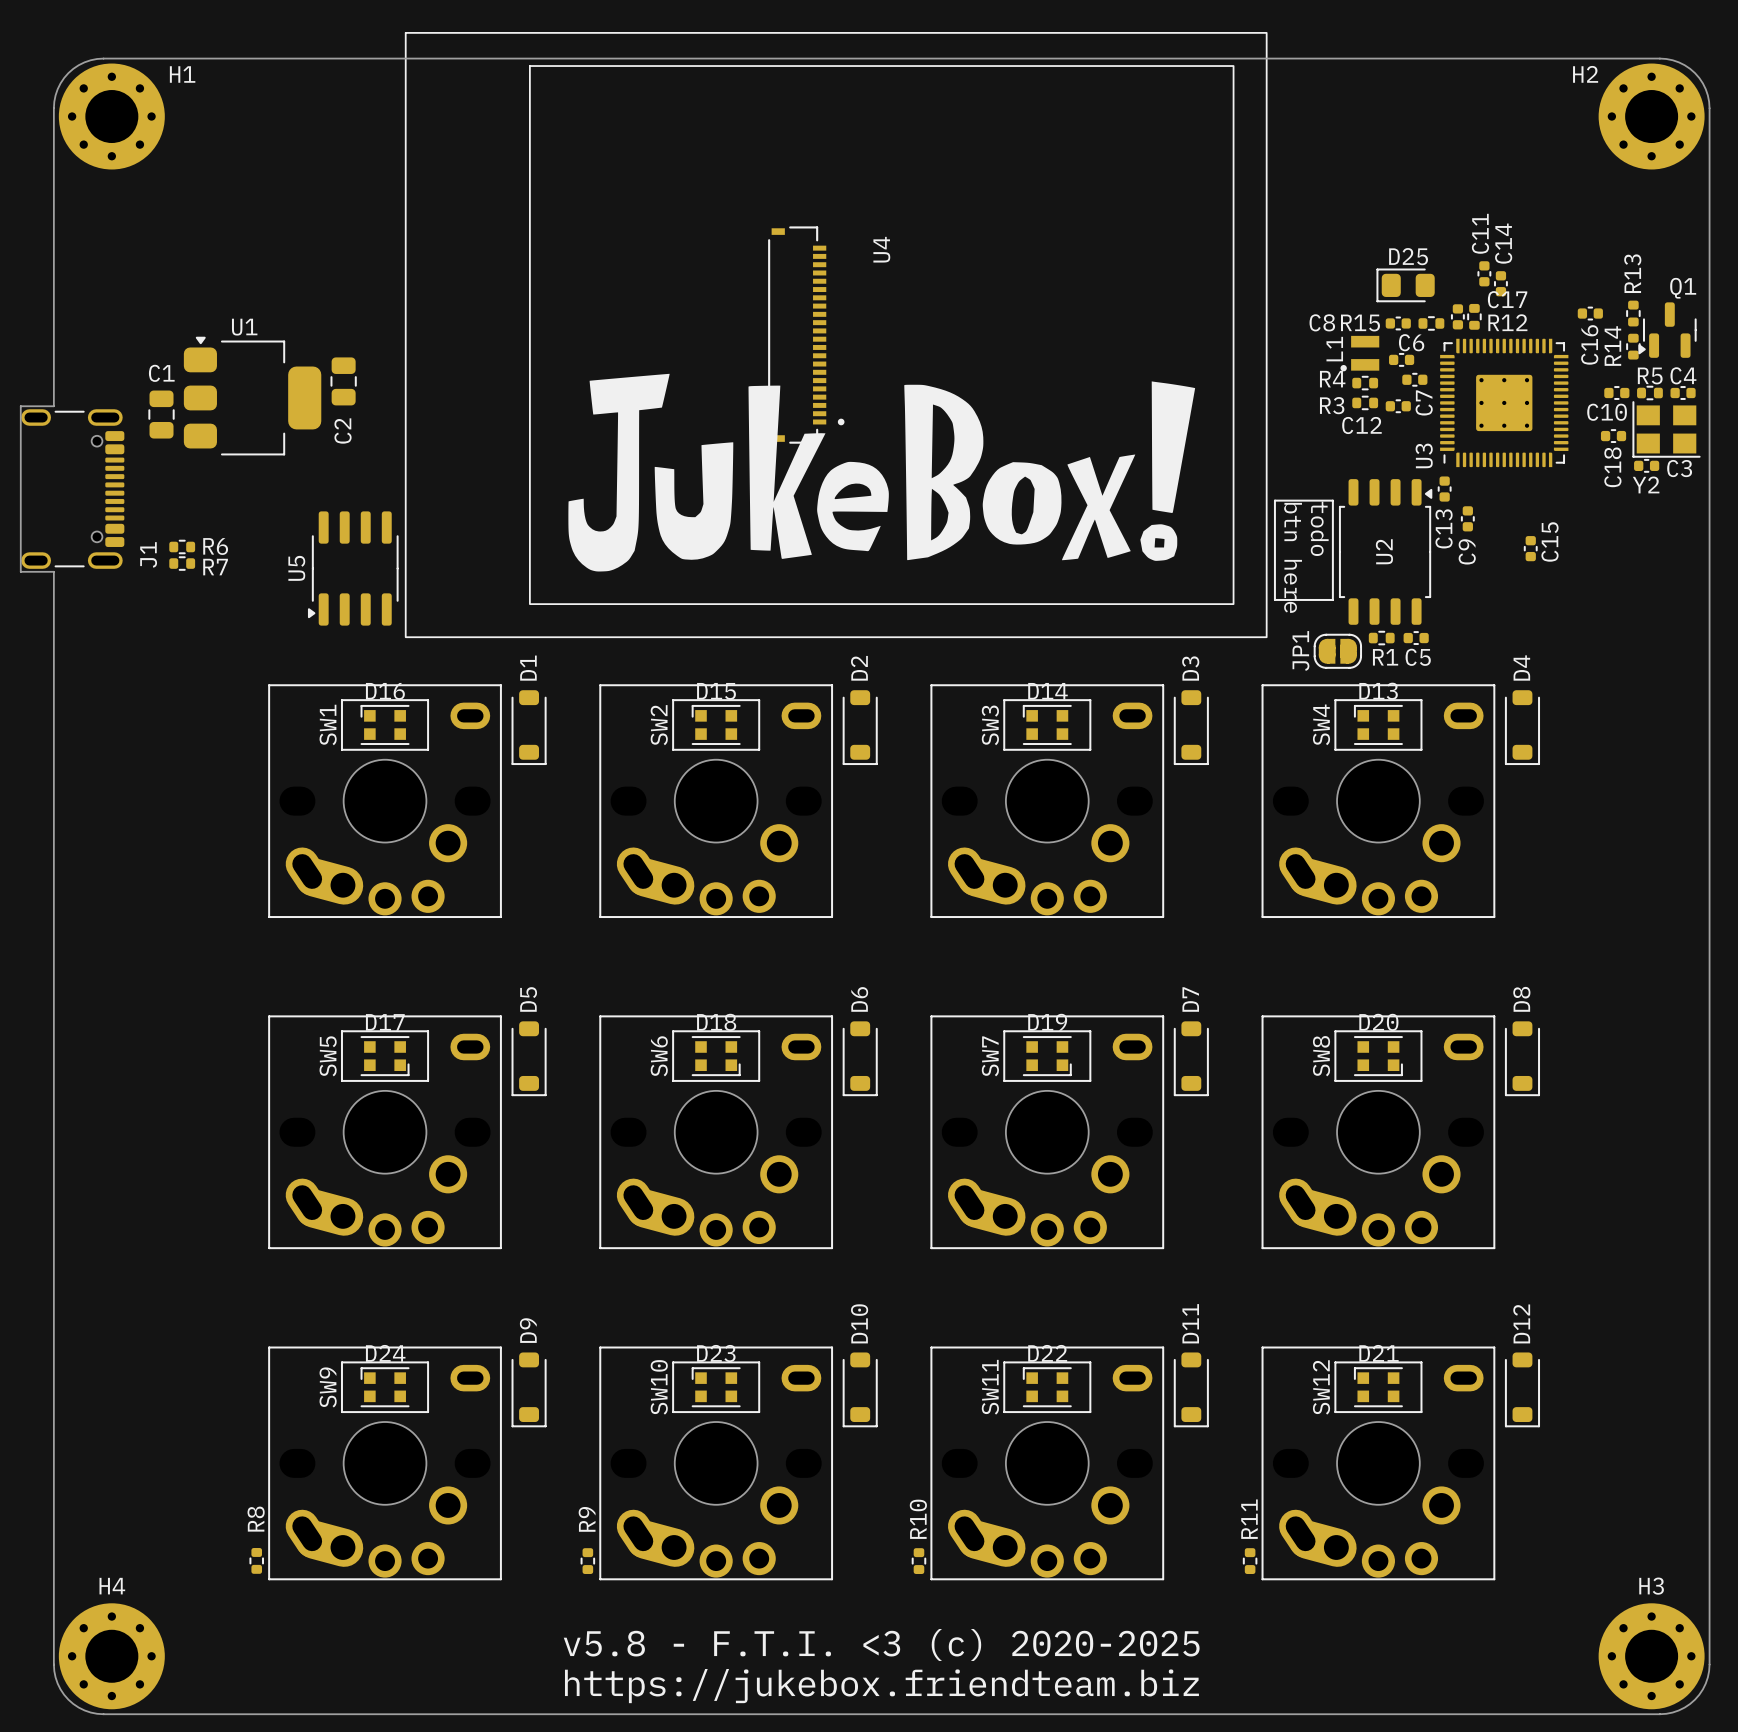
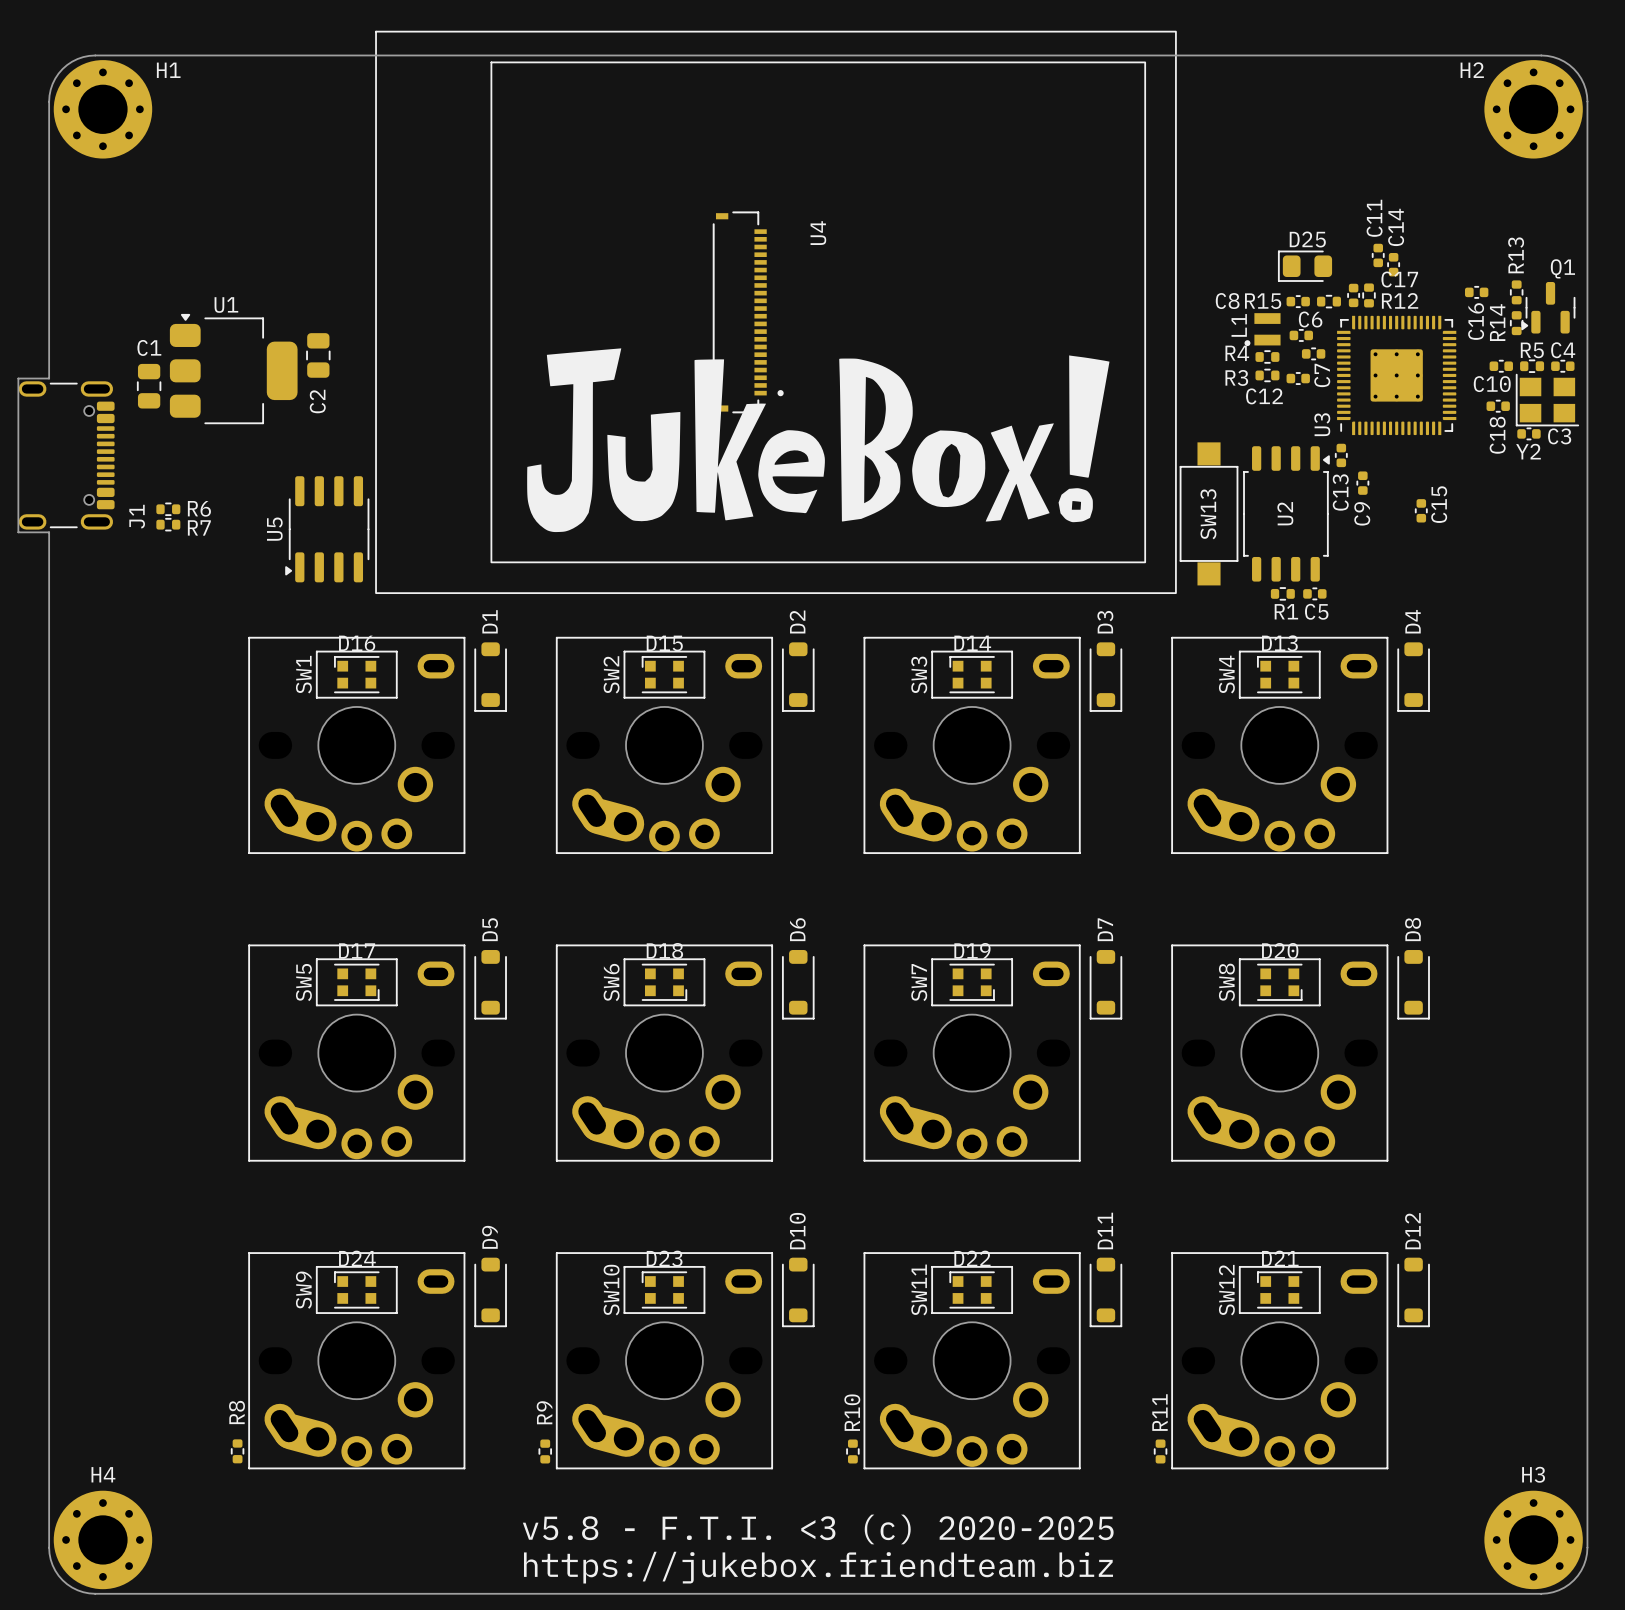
line: (1274, 500) (1332, 500) (1332, 599) (1274, 599) (1274, 500) -> none
text: todo (1319, 528) -> none
SW13: none -> (1209, 513)
text: btn here (1293, 557) -> none
JP1: (1337, 651) -> none

